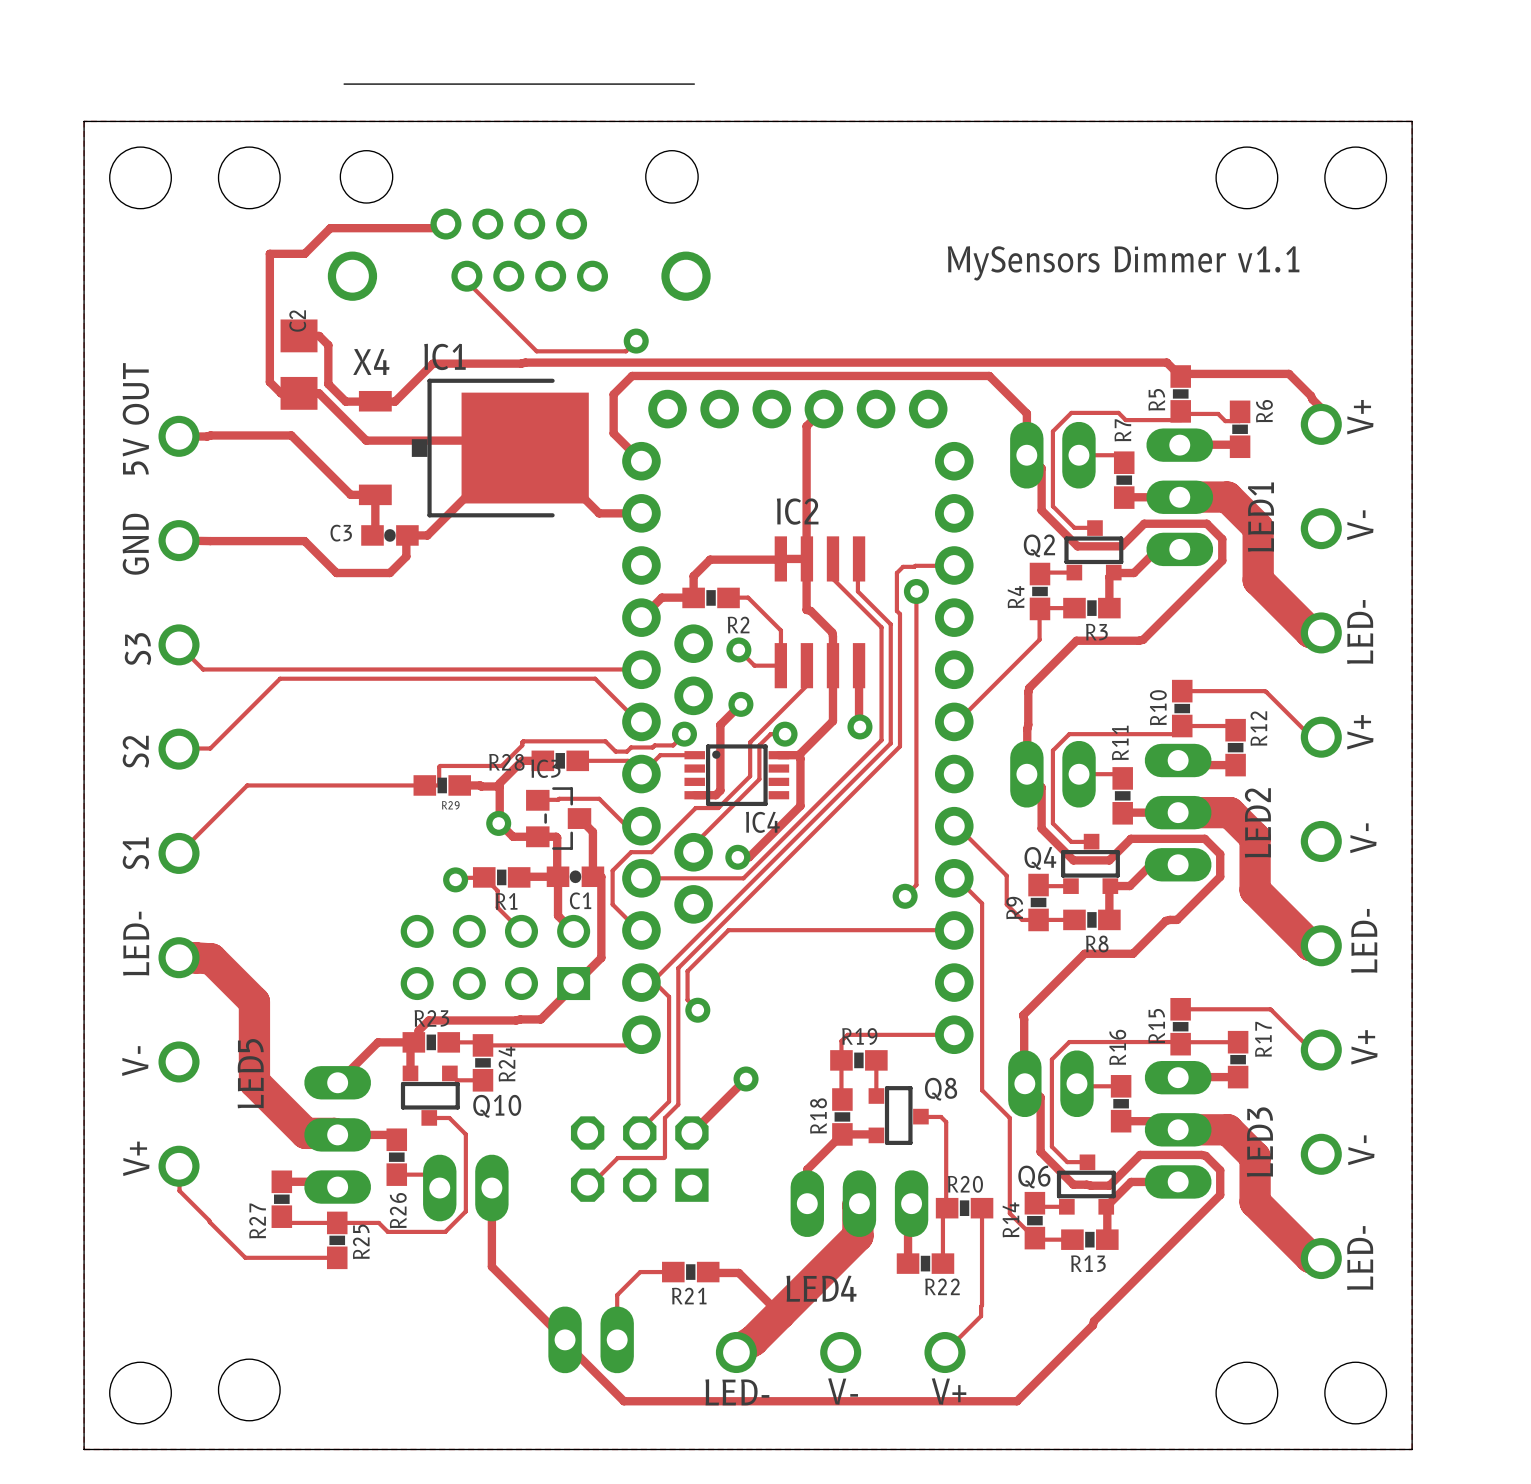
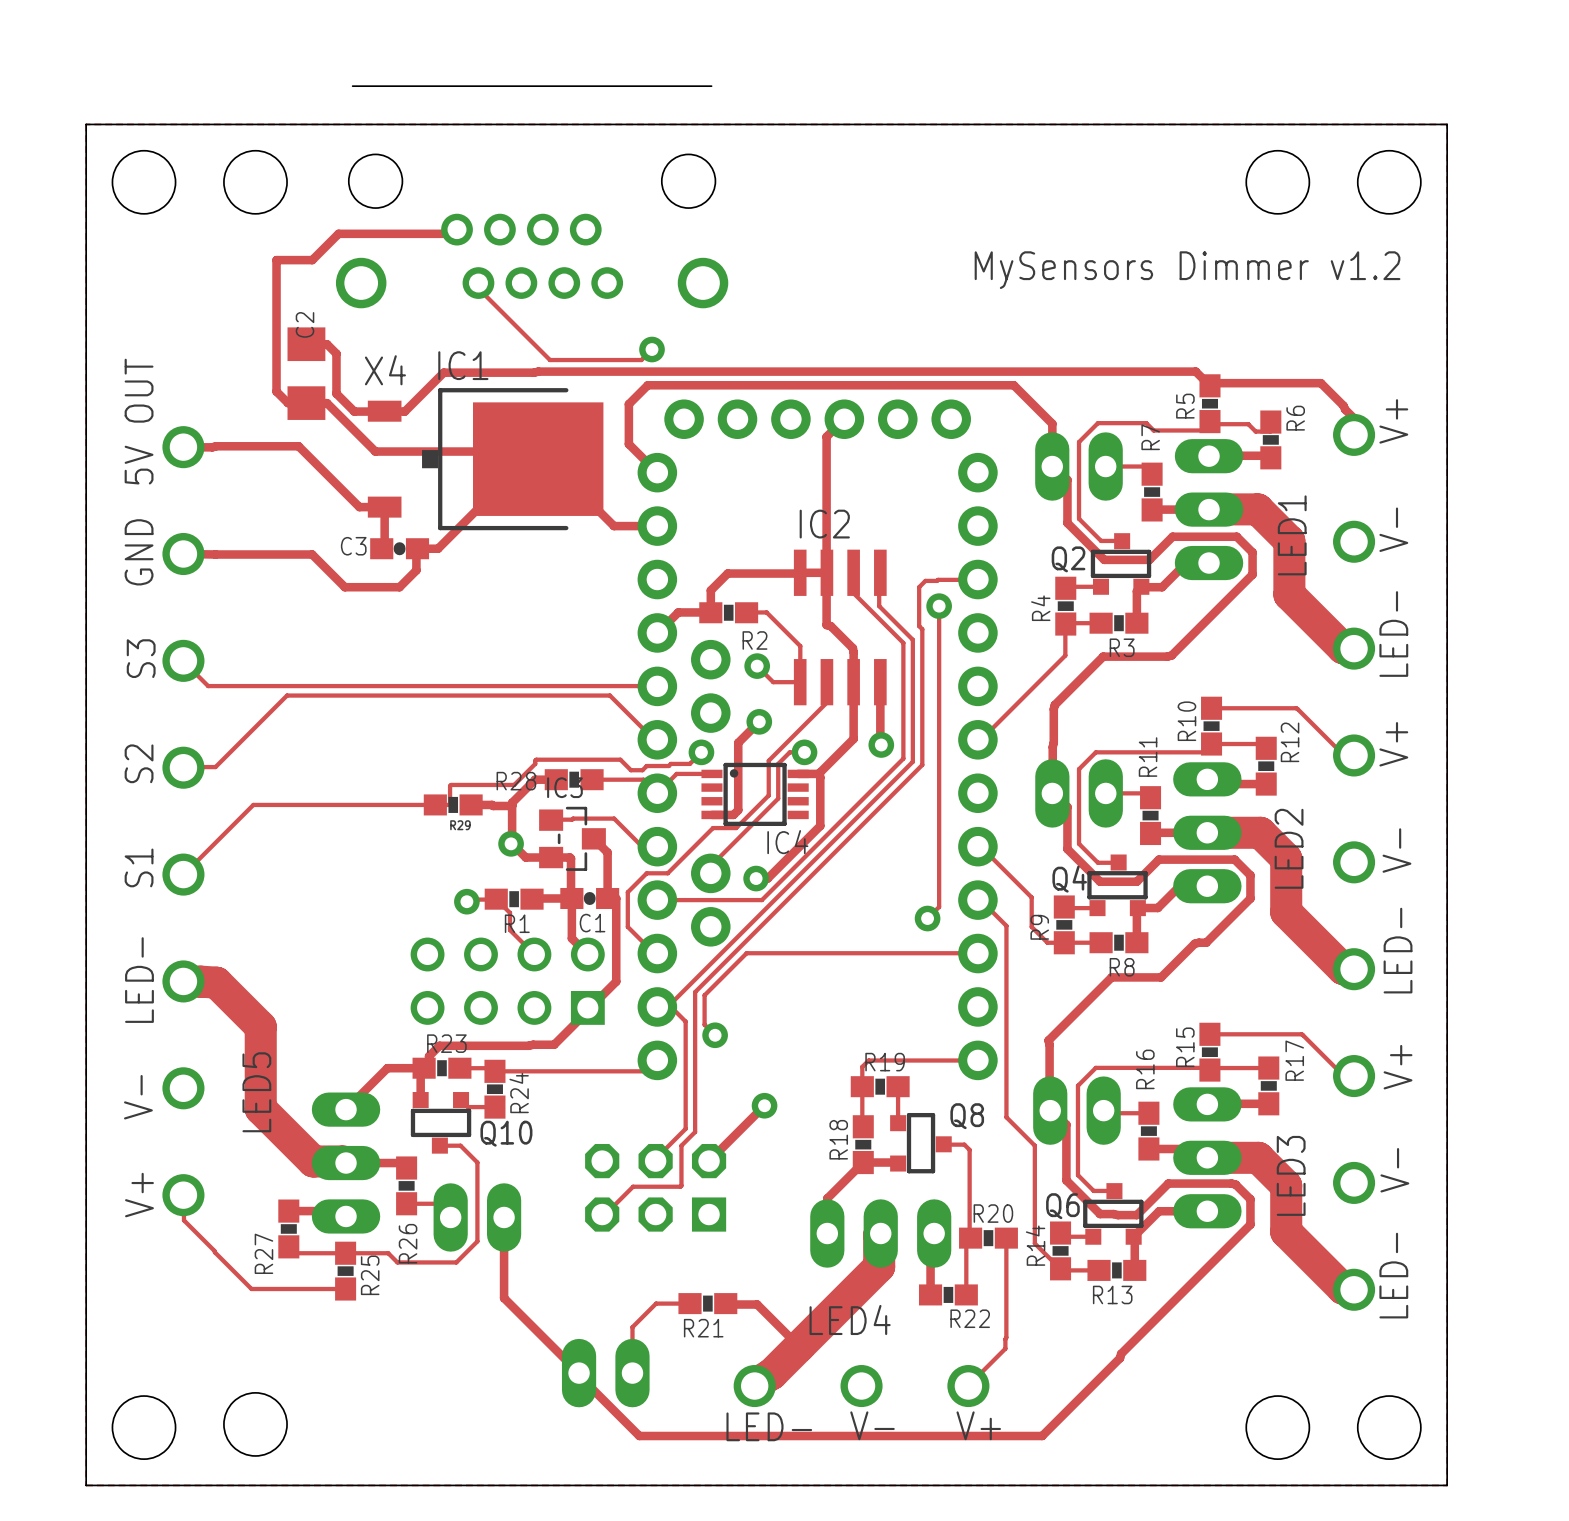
text: MySensors Dimmer v1.1 (1123, 263) -> MySensors Dimmer v1.2 (1187, 270)

